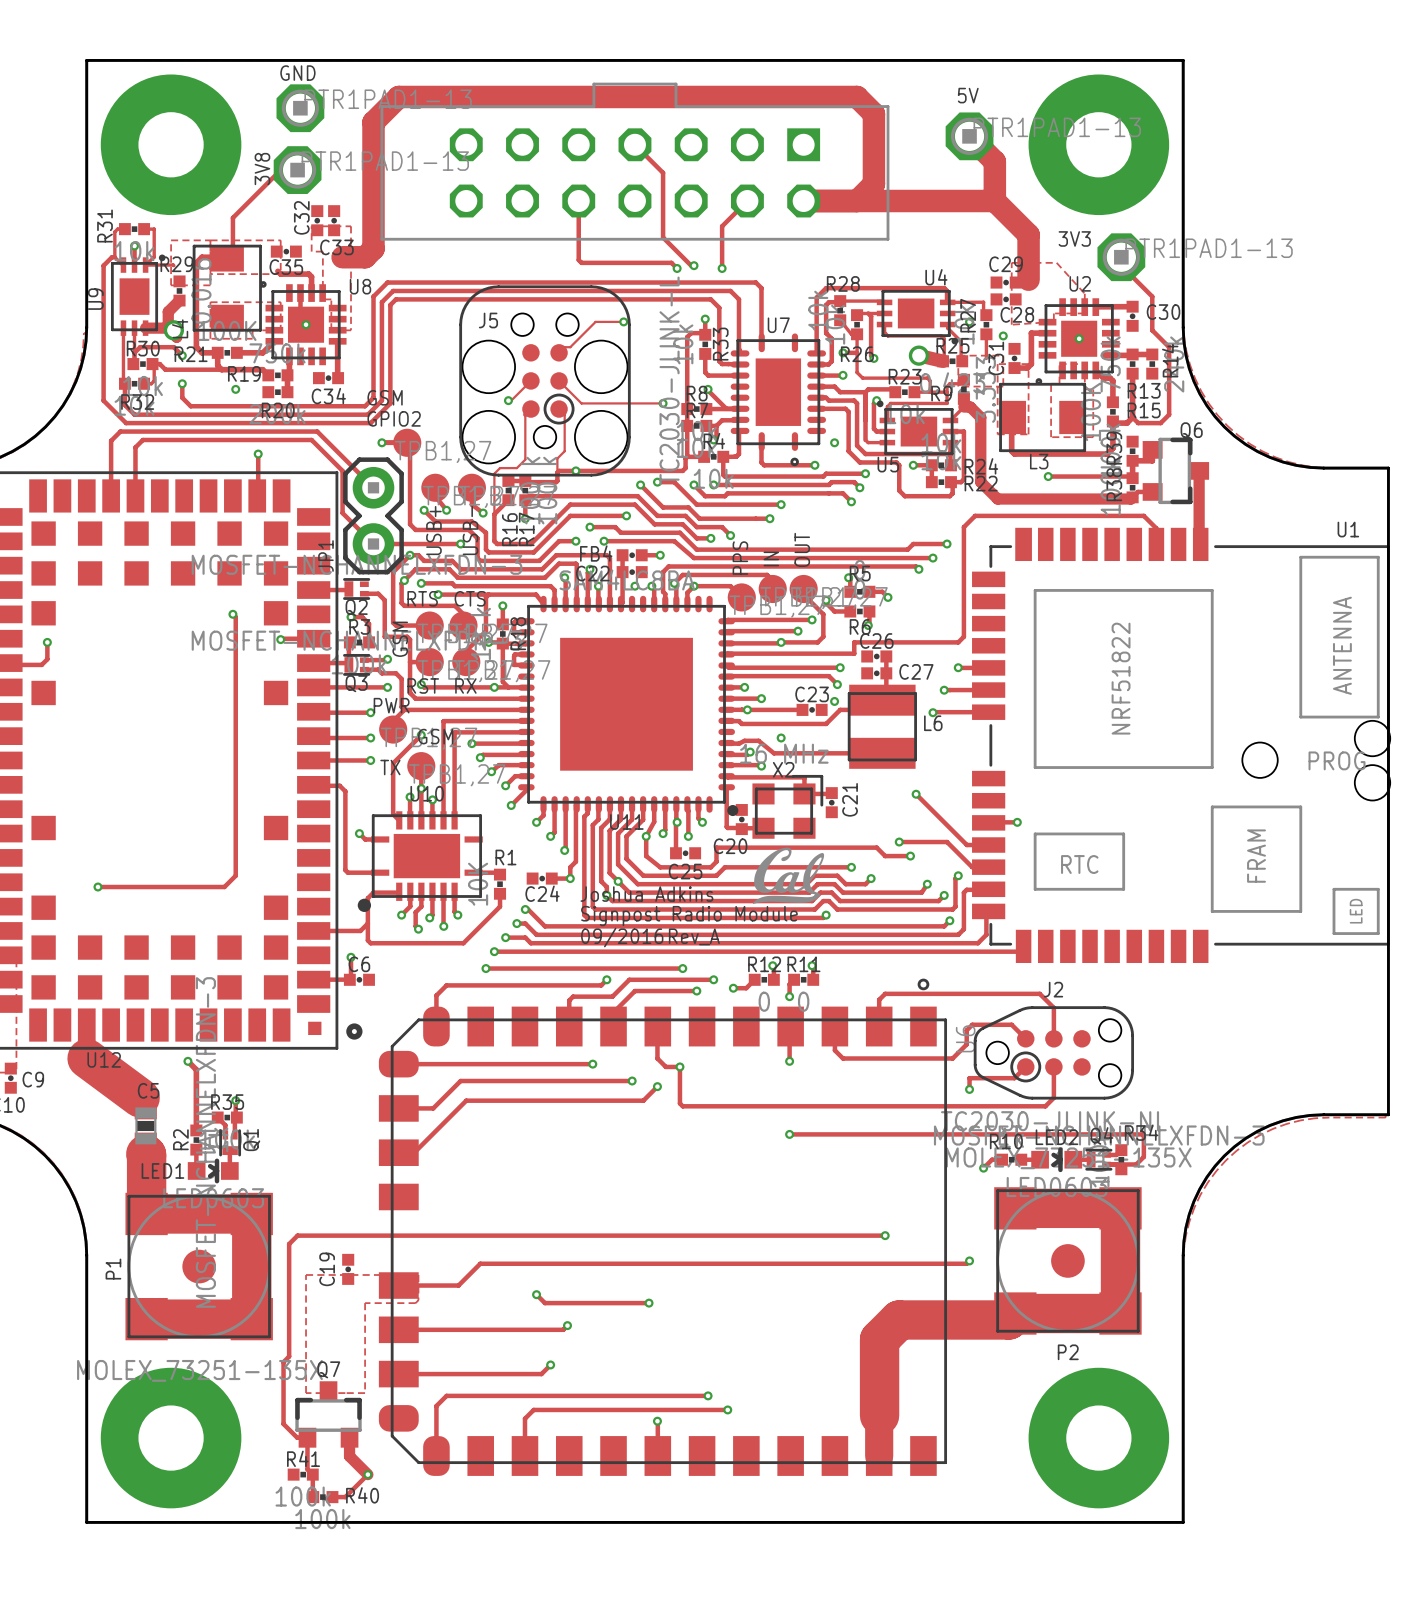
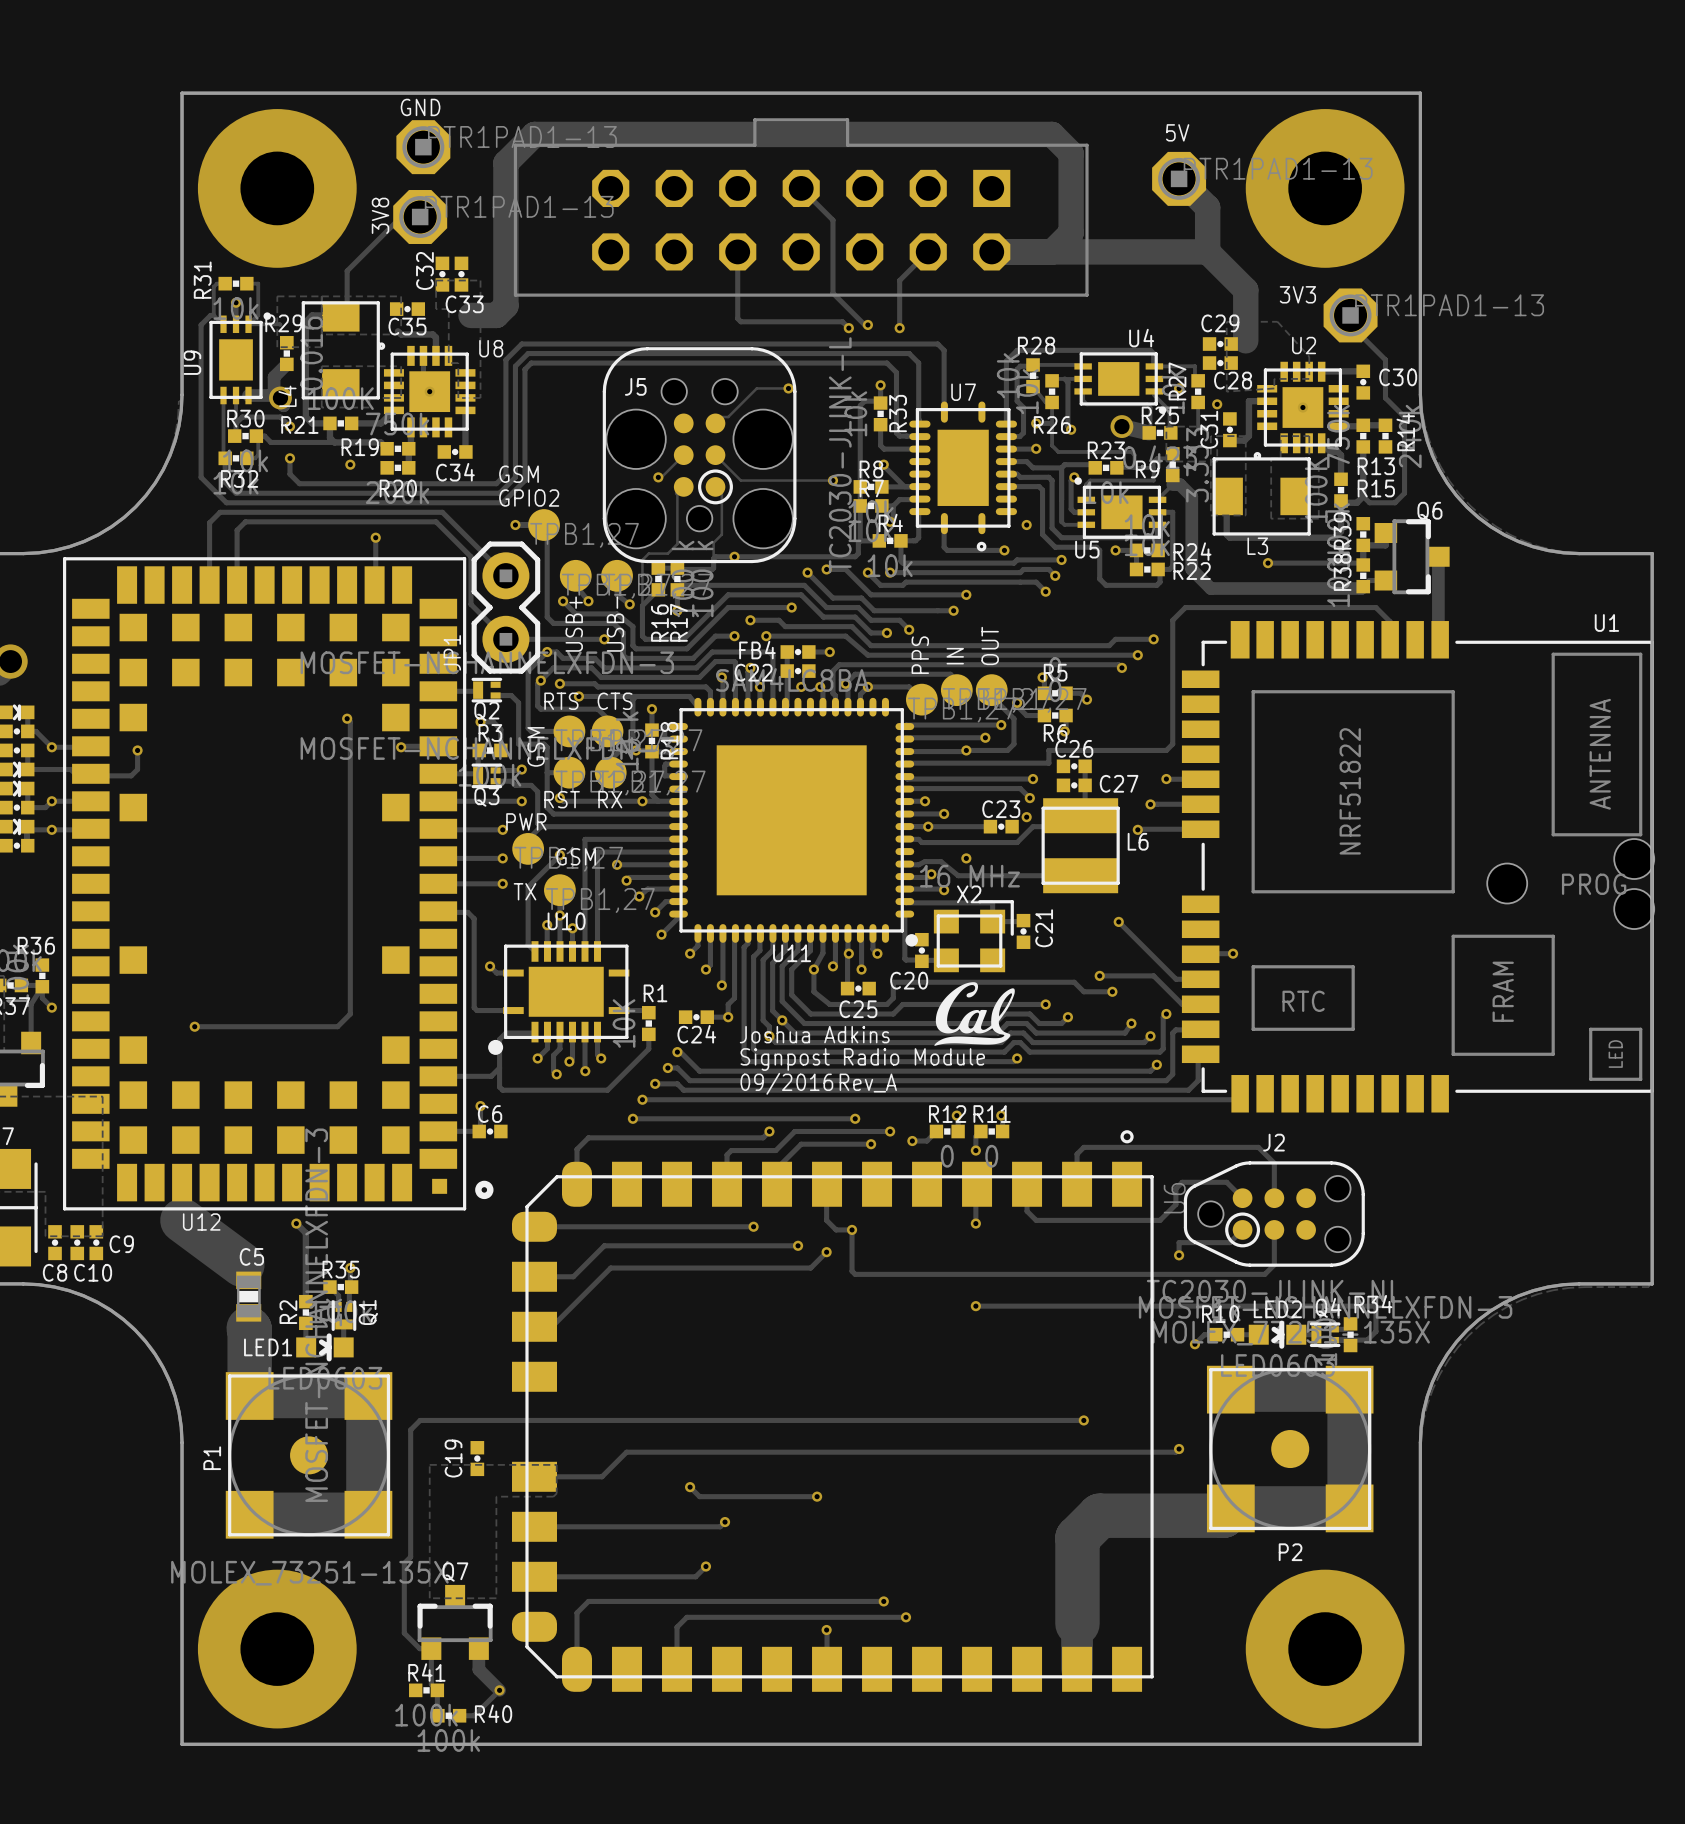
drawing shape: [752, 847, 825, 904] -> [934, 982, 1015, 1046]

